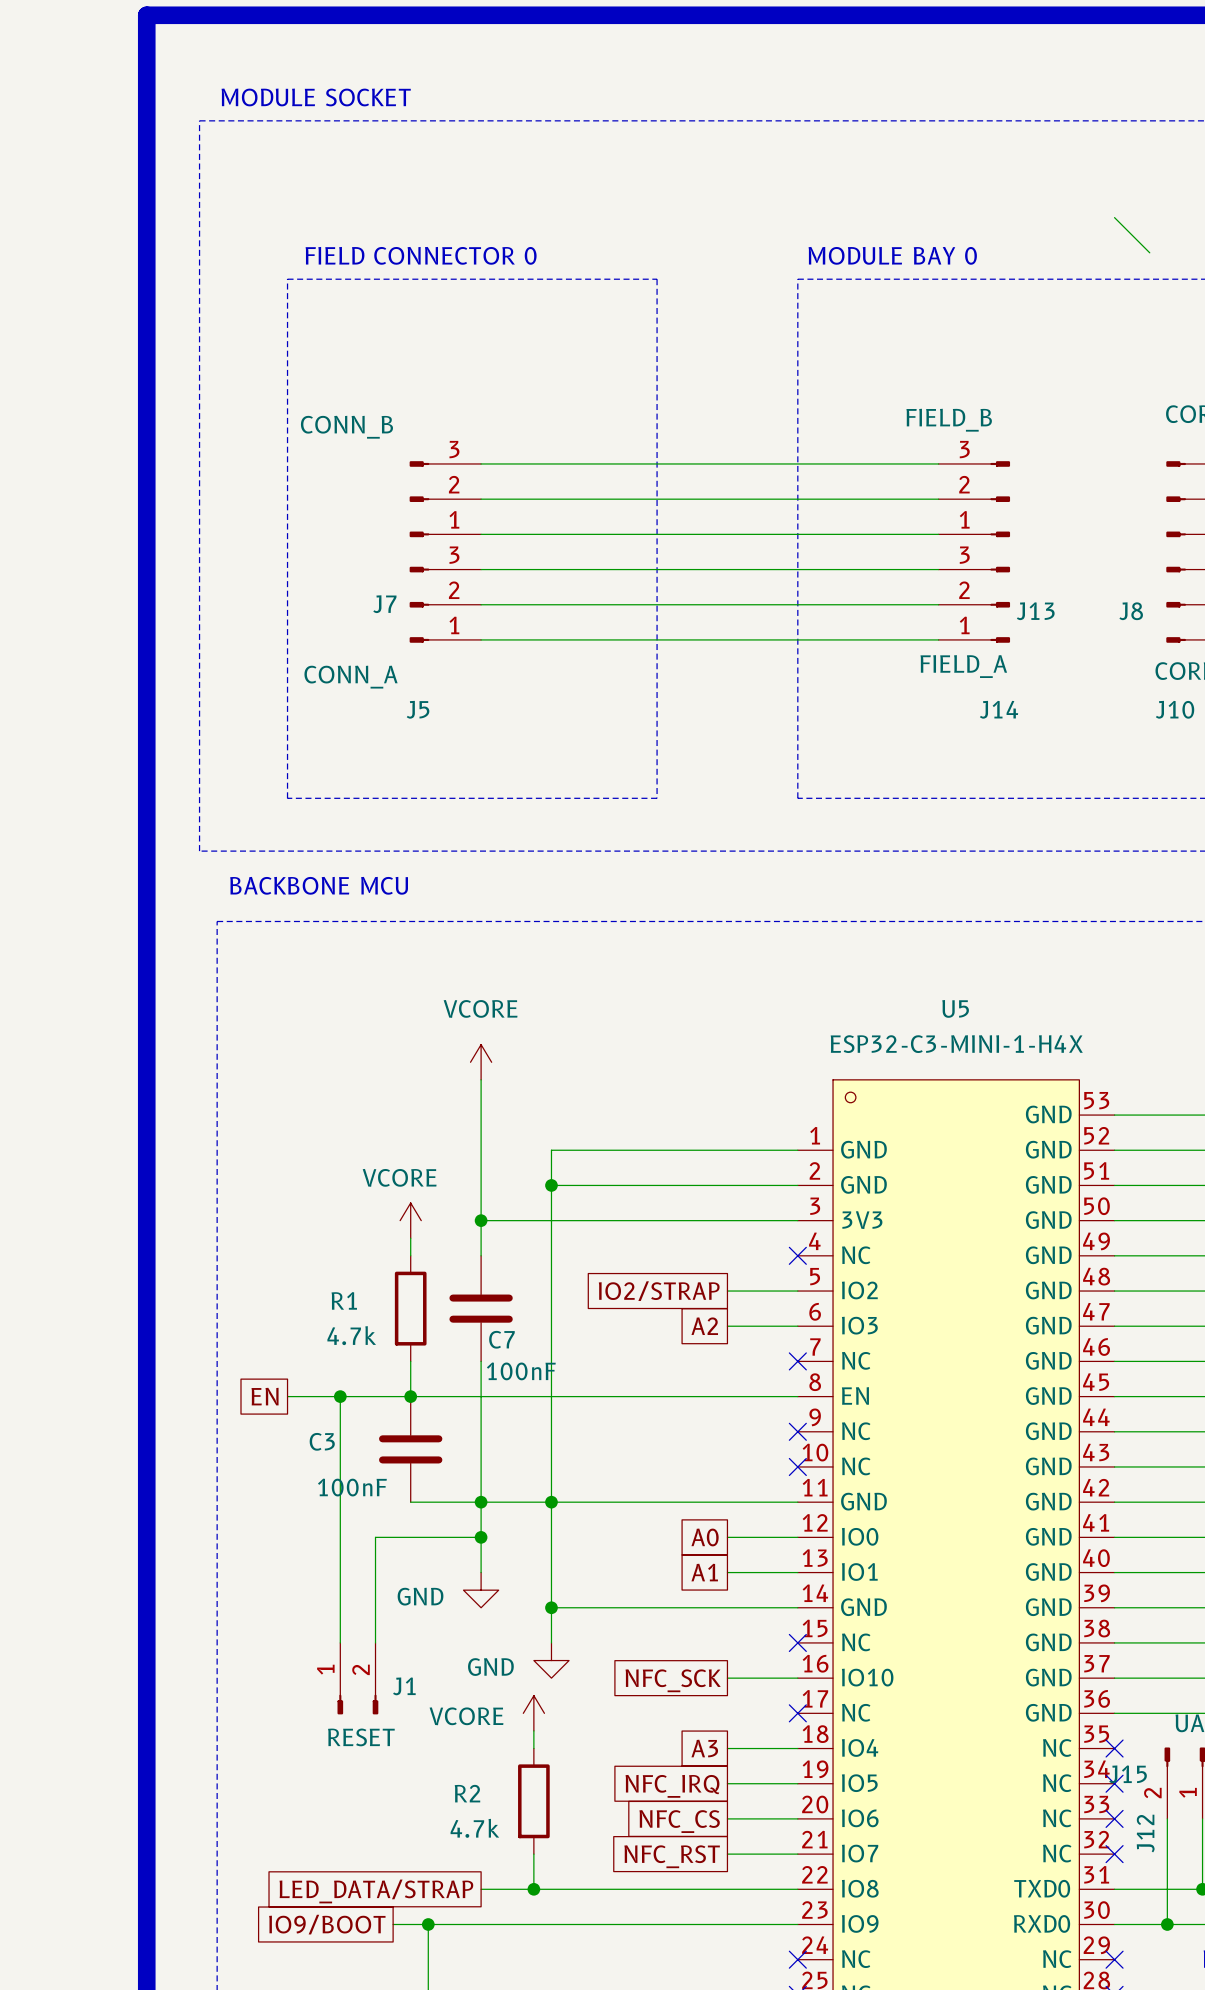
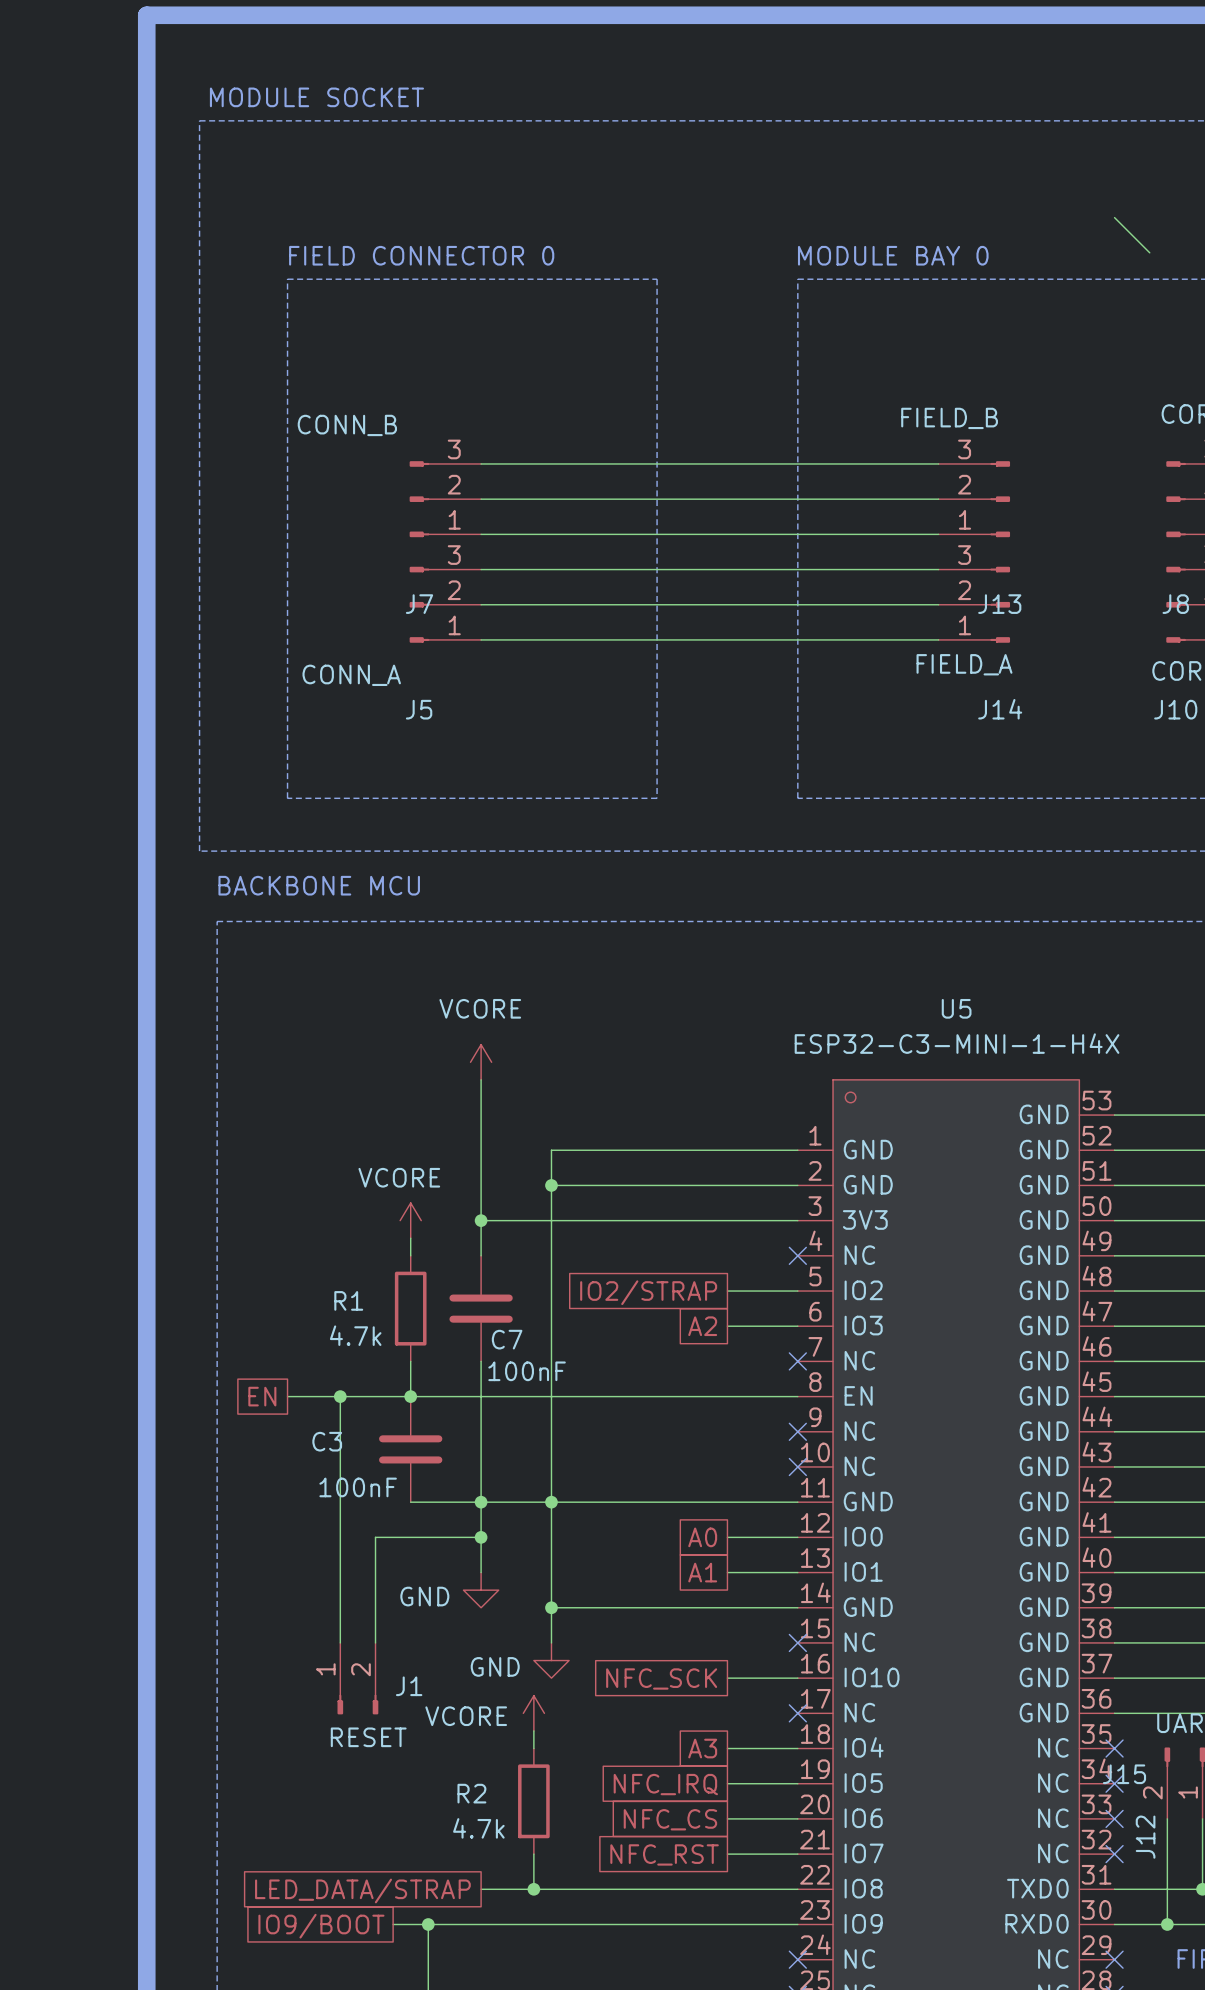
J7 name position: J7 (384, 604) -> J7 (419, 604)
J13 name position: J13 (1035, 611) -> J13 (999, 604)
J8 name position: J8 (1131, 611) -> J8 (1175, 604)

